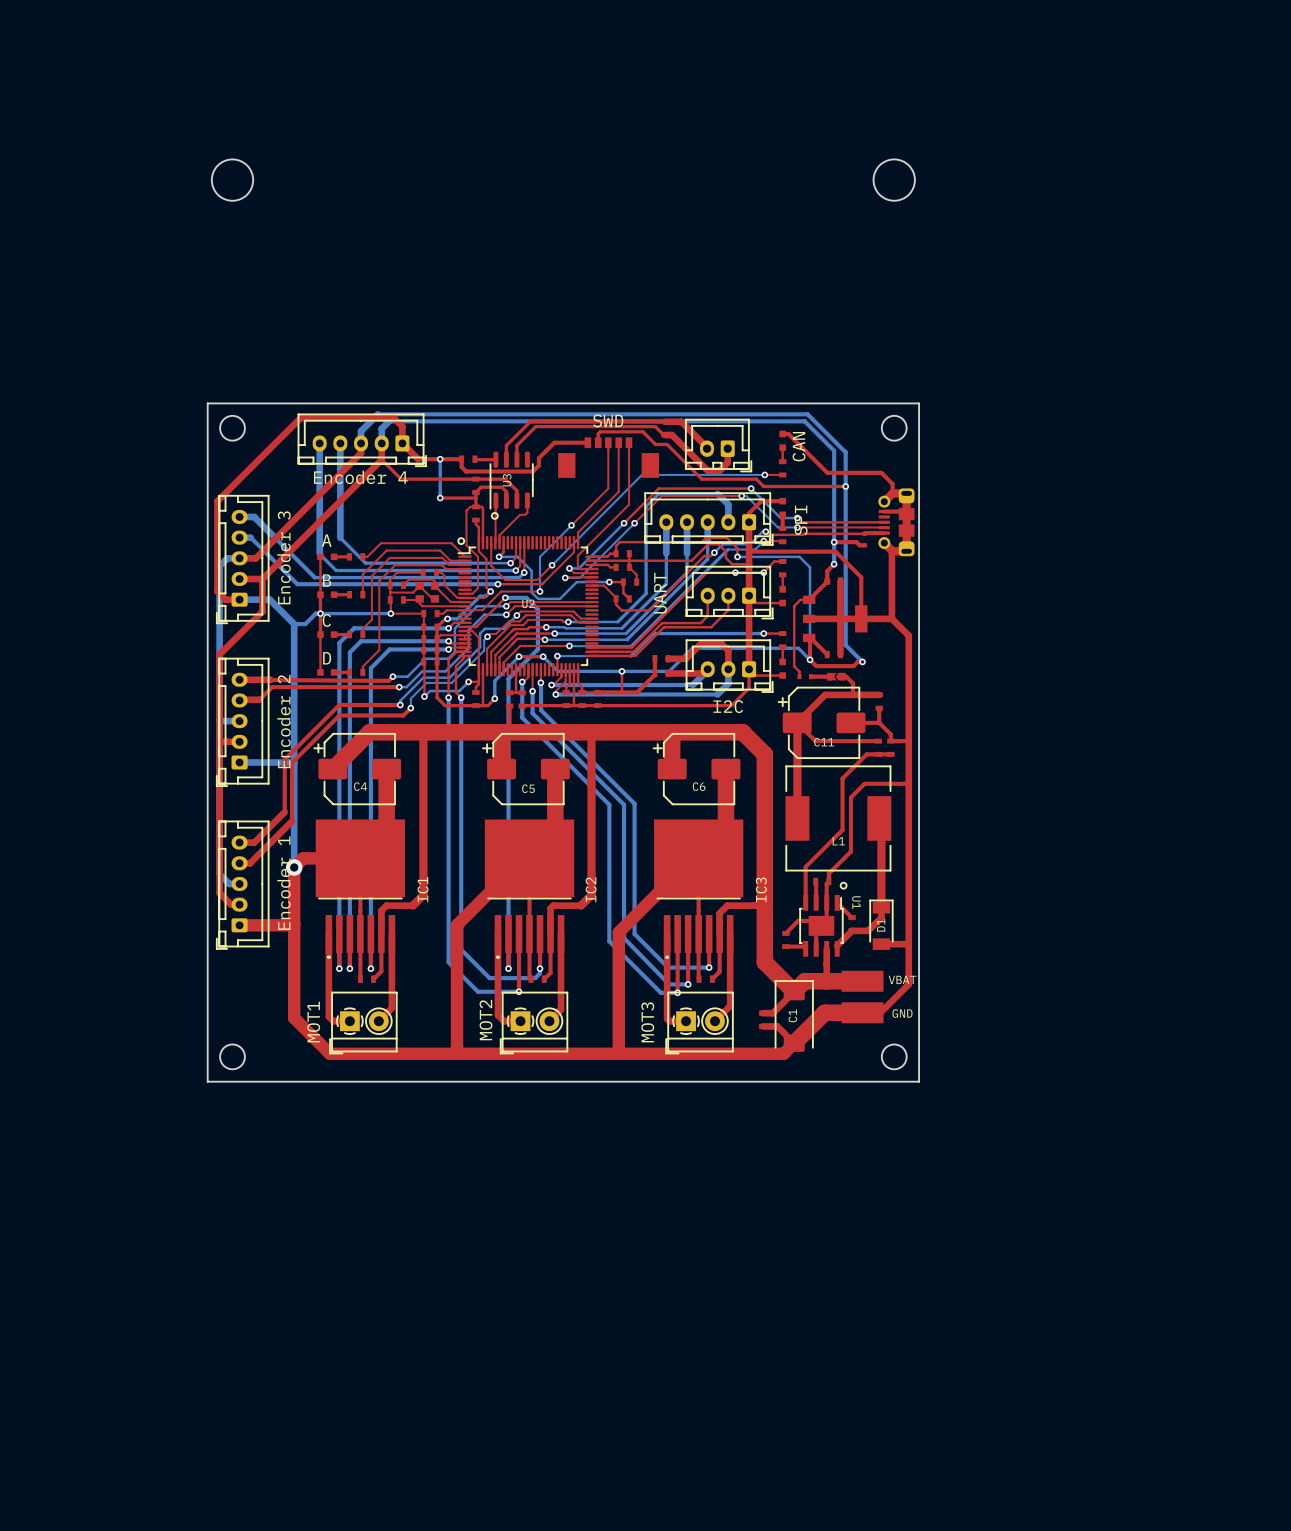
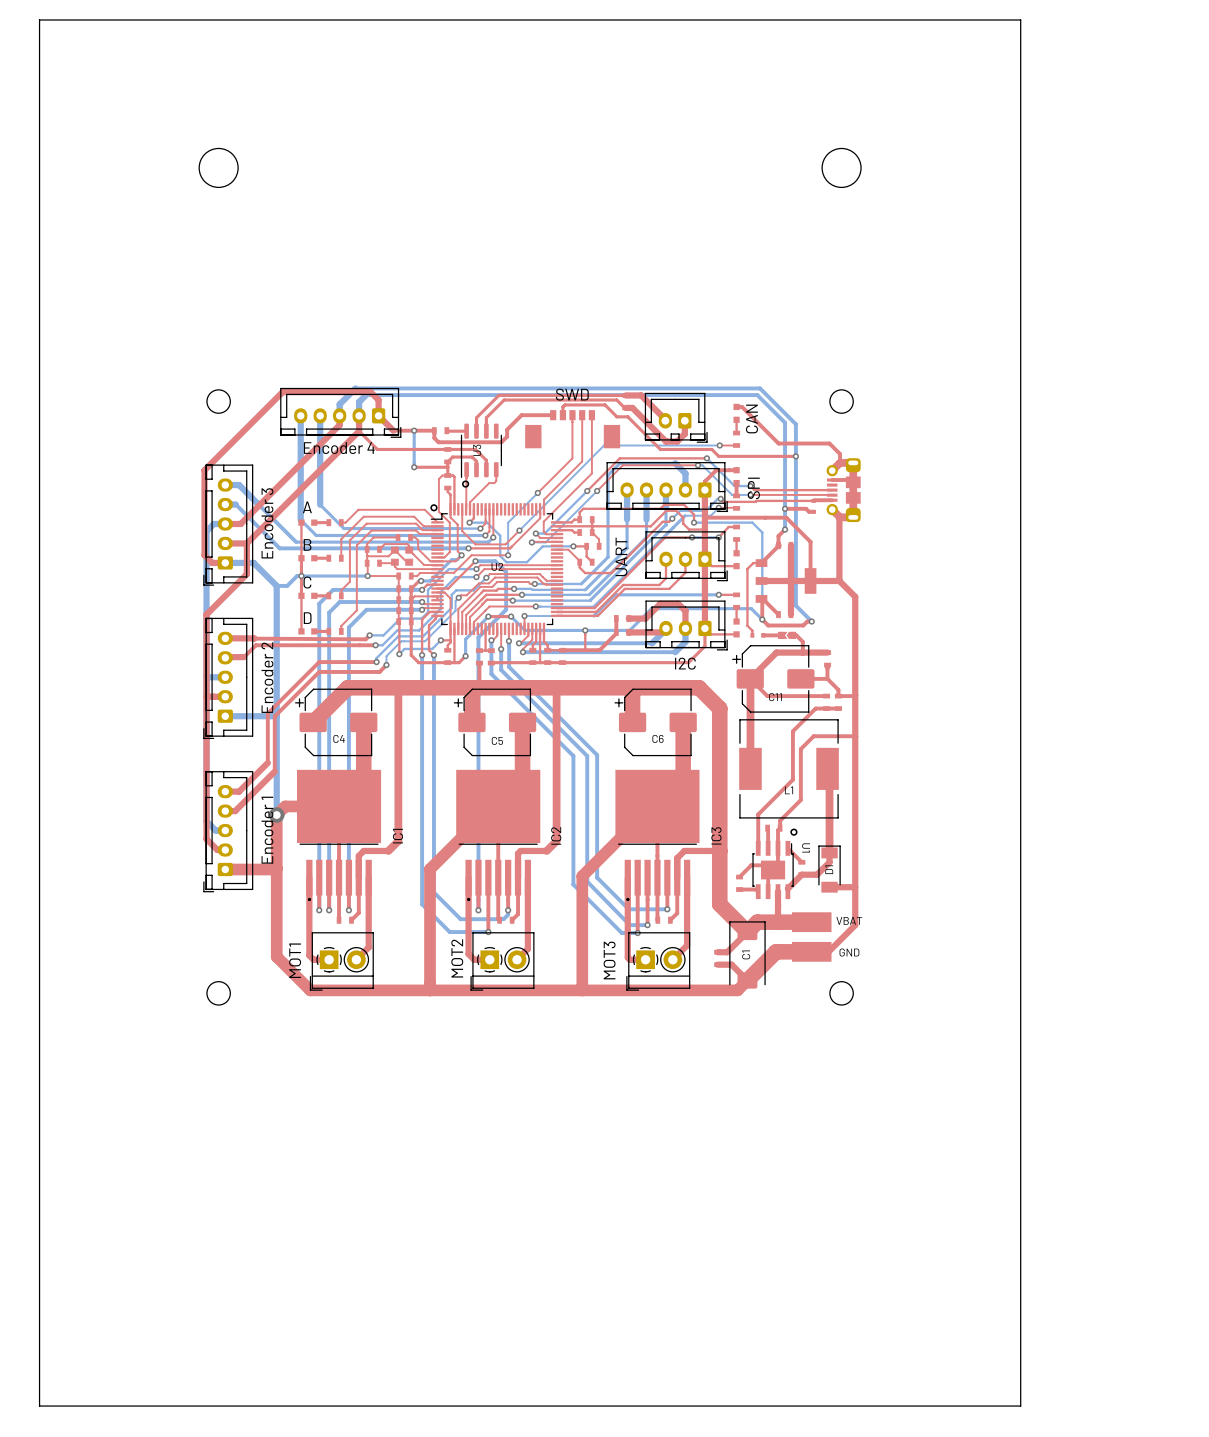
board edge: none -> (39, 19) (1020, 19) (1020, 1406) (39, 1406) (39, 19)
board edge: (207, 403) (919, 403) (919, 1081) (207, 1081) (207, 403) -> none

